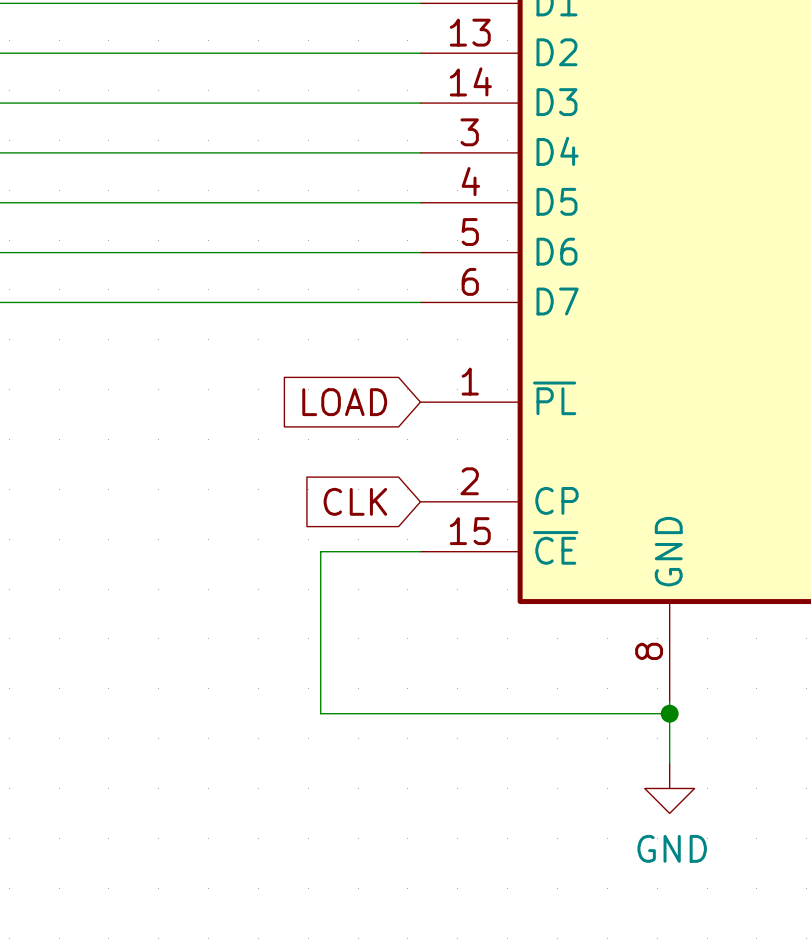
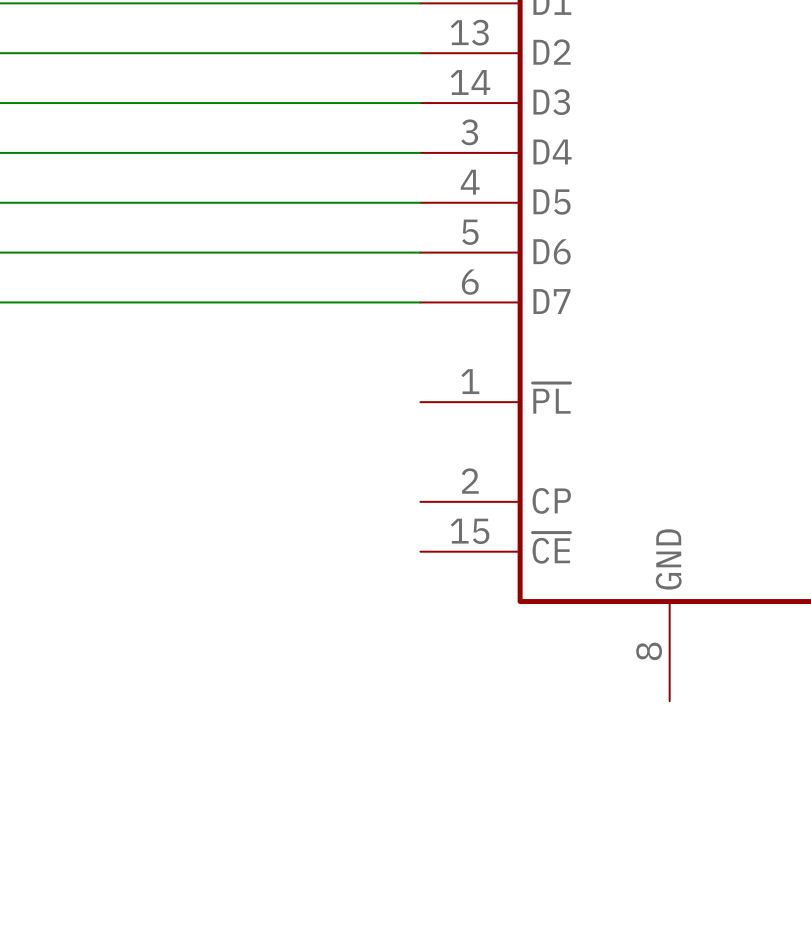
global label: LOAD (344, 402) -> none
global label: CLK (355, 501) -> none
wire: (420, 551) (320, 551) (320, 713) (669, 713) -> none
wire: (669, 701) (669, 763) -> none
junction: (669, 713) -> none
power symbol: GND (669, 788) -> none

